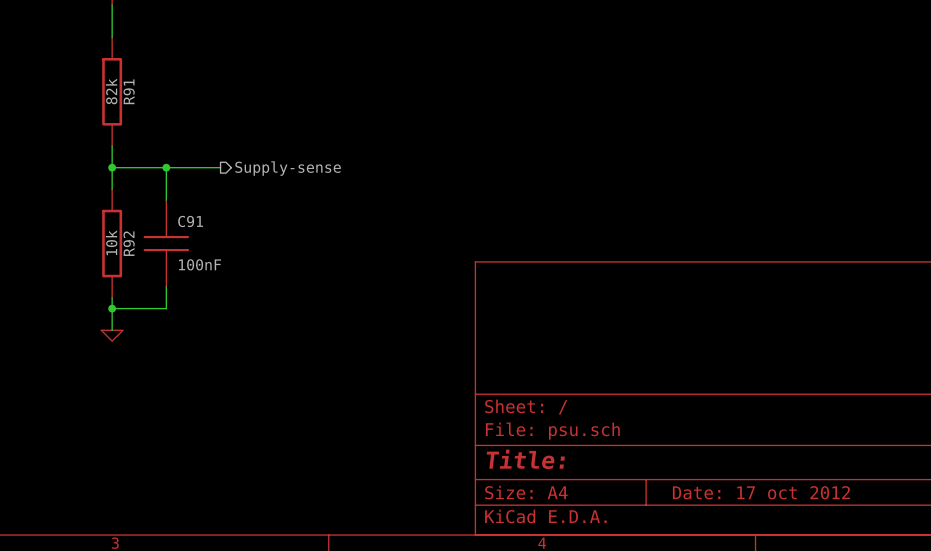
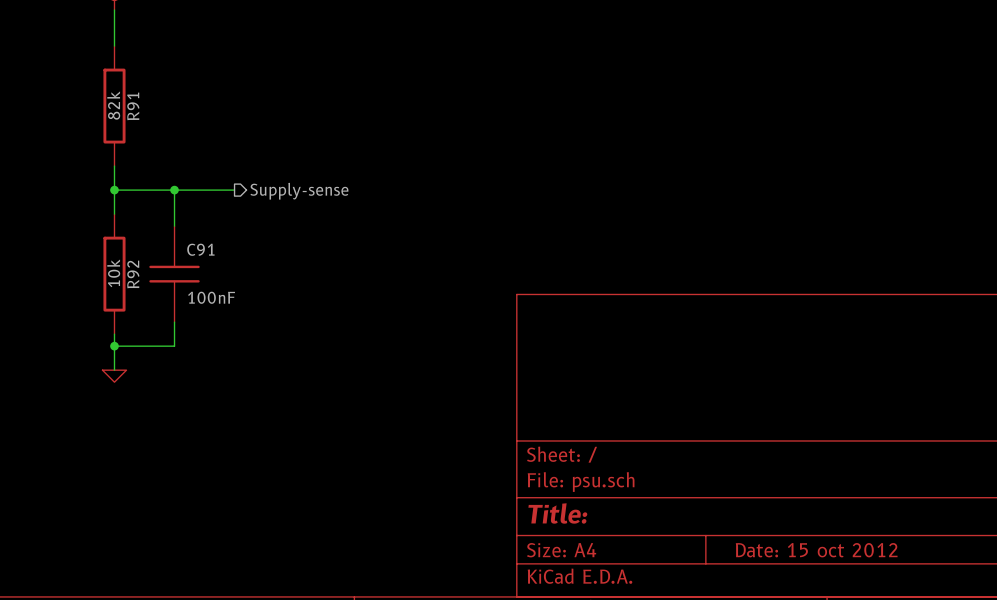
title block: Date: 17 oct 2012 (761, 492) -> Date: 15 oct 2012 (816, 550)

